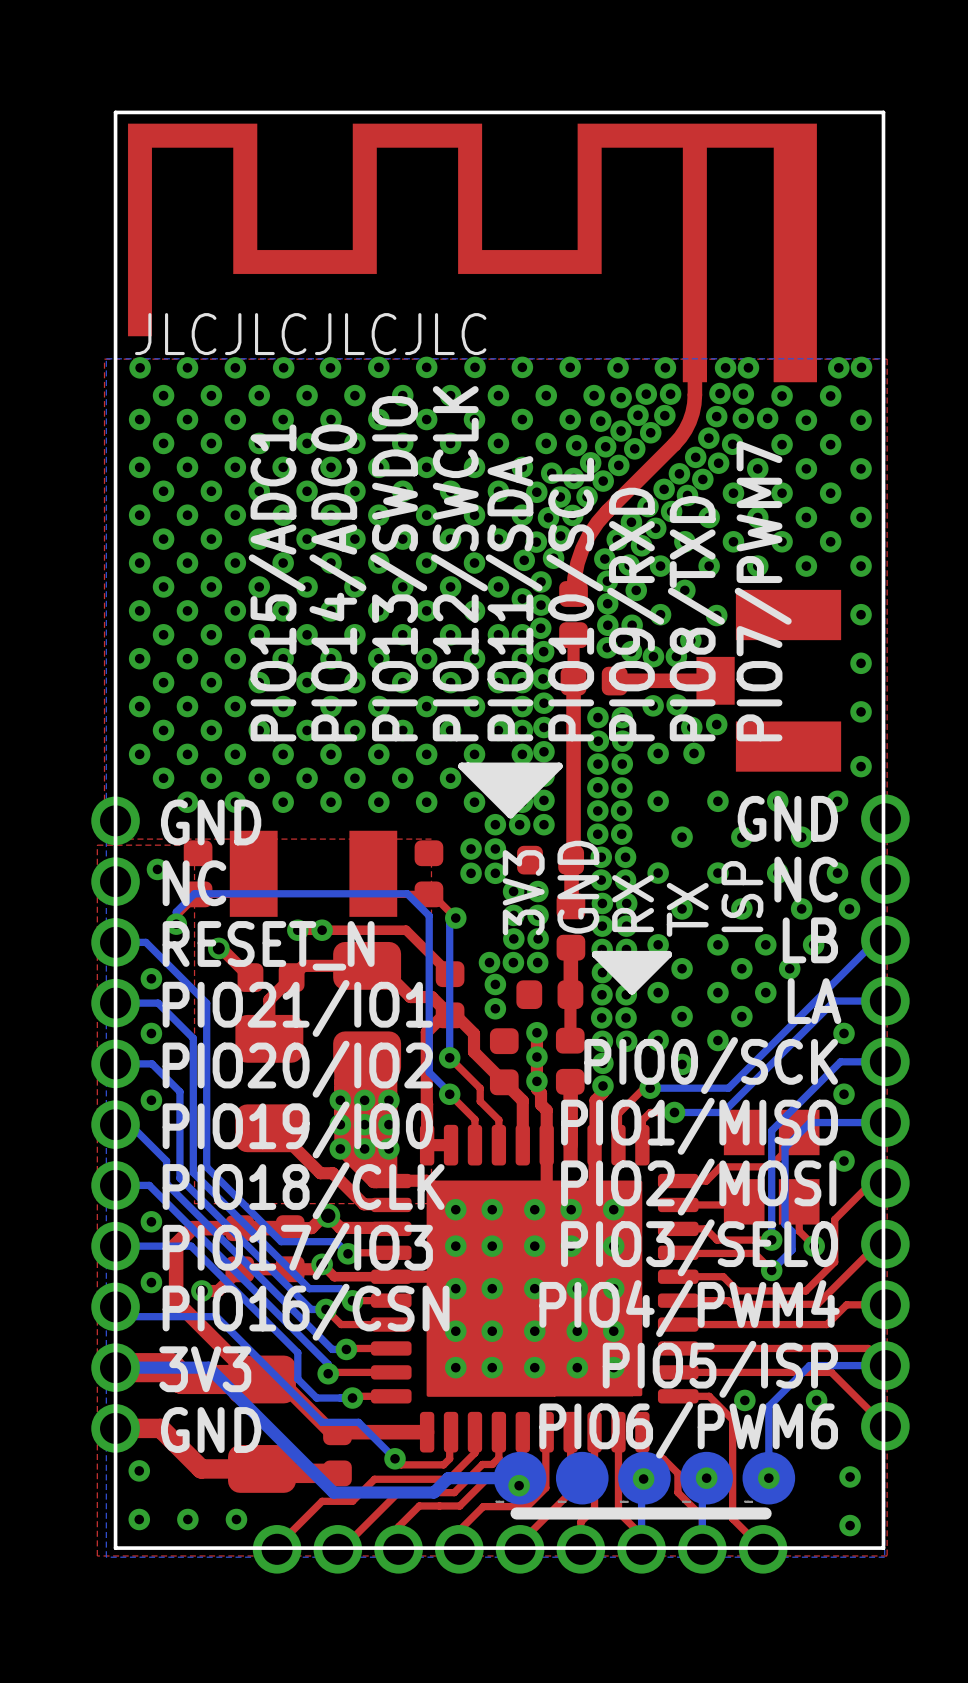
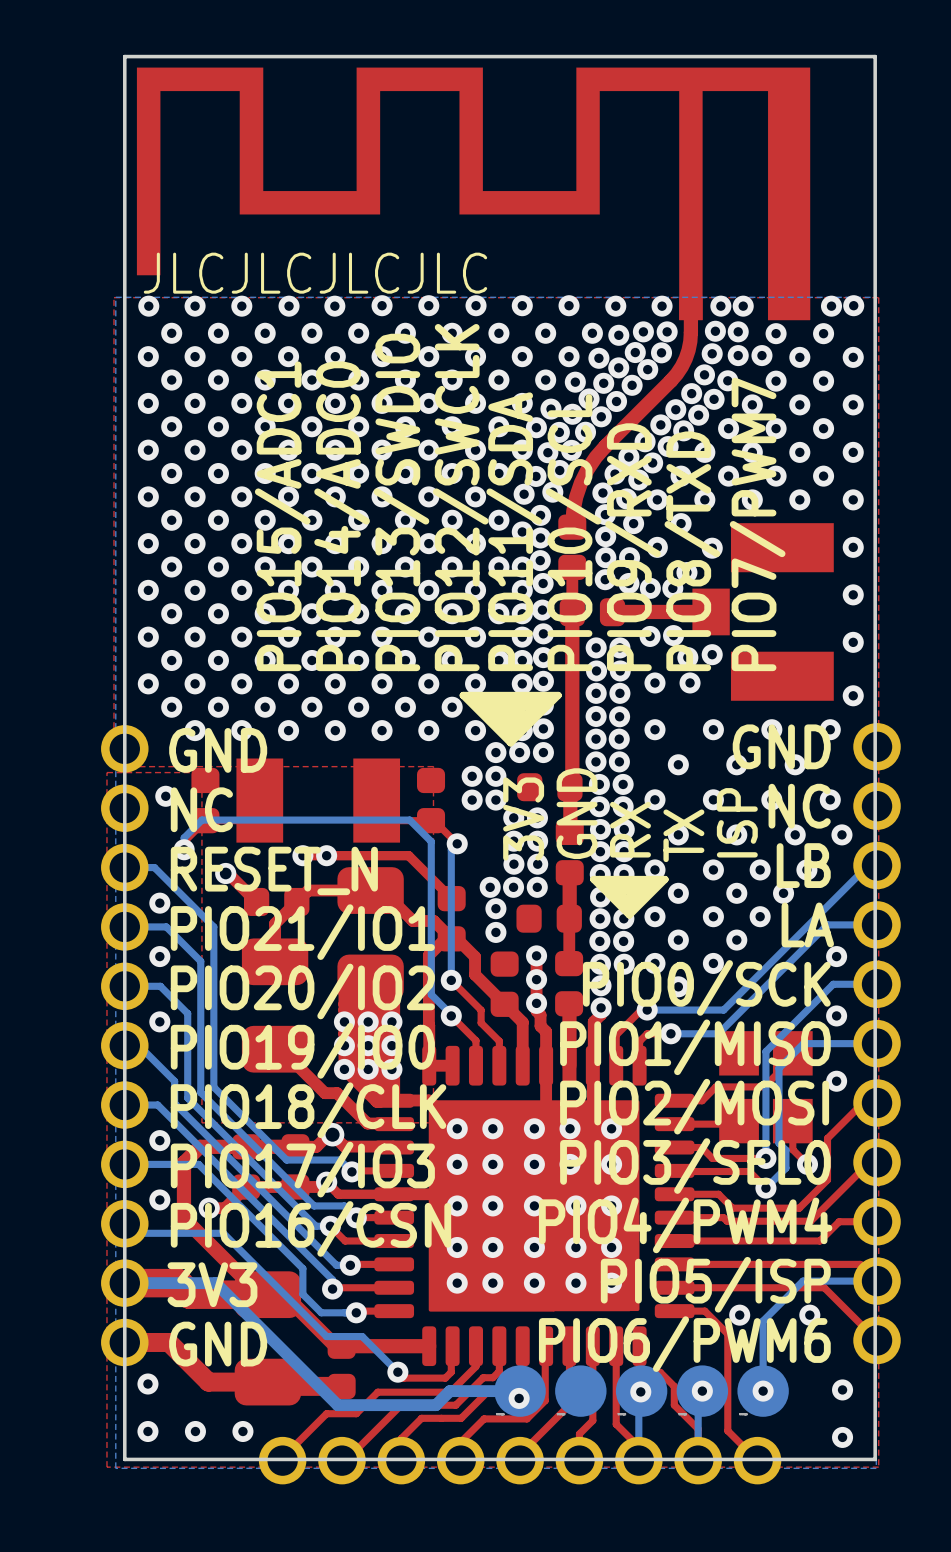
line: (765, 1513) (516, 1513) -> none

